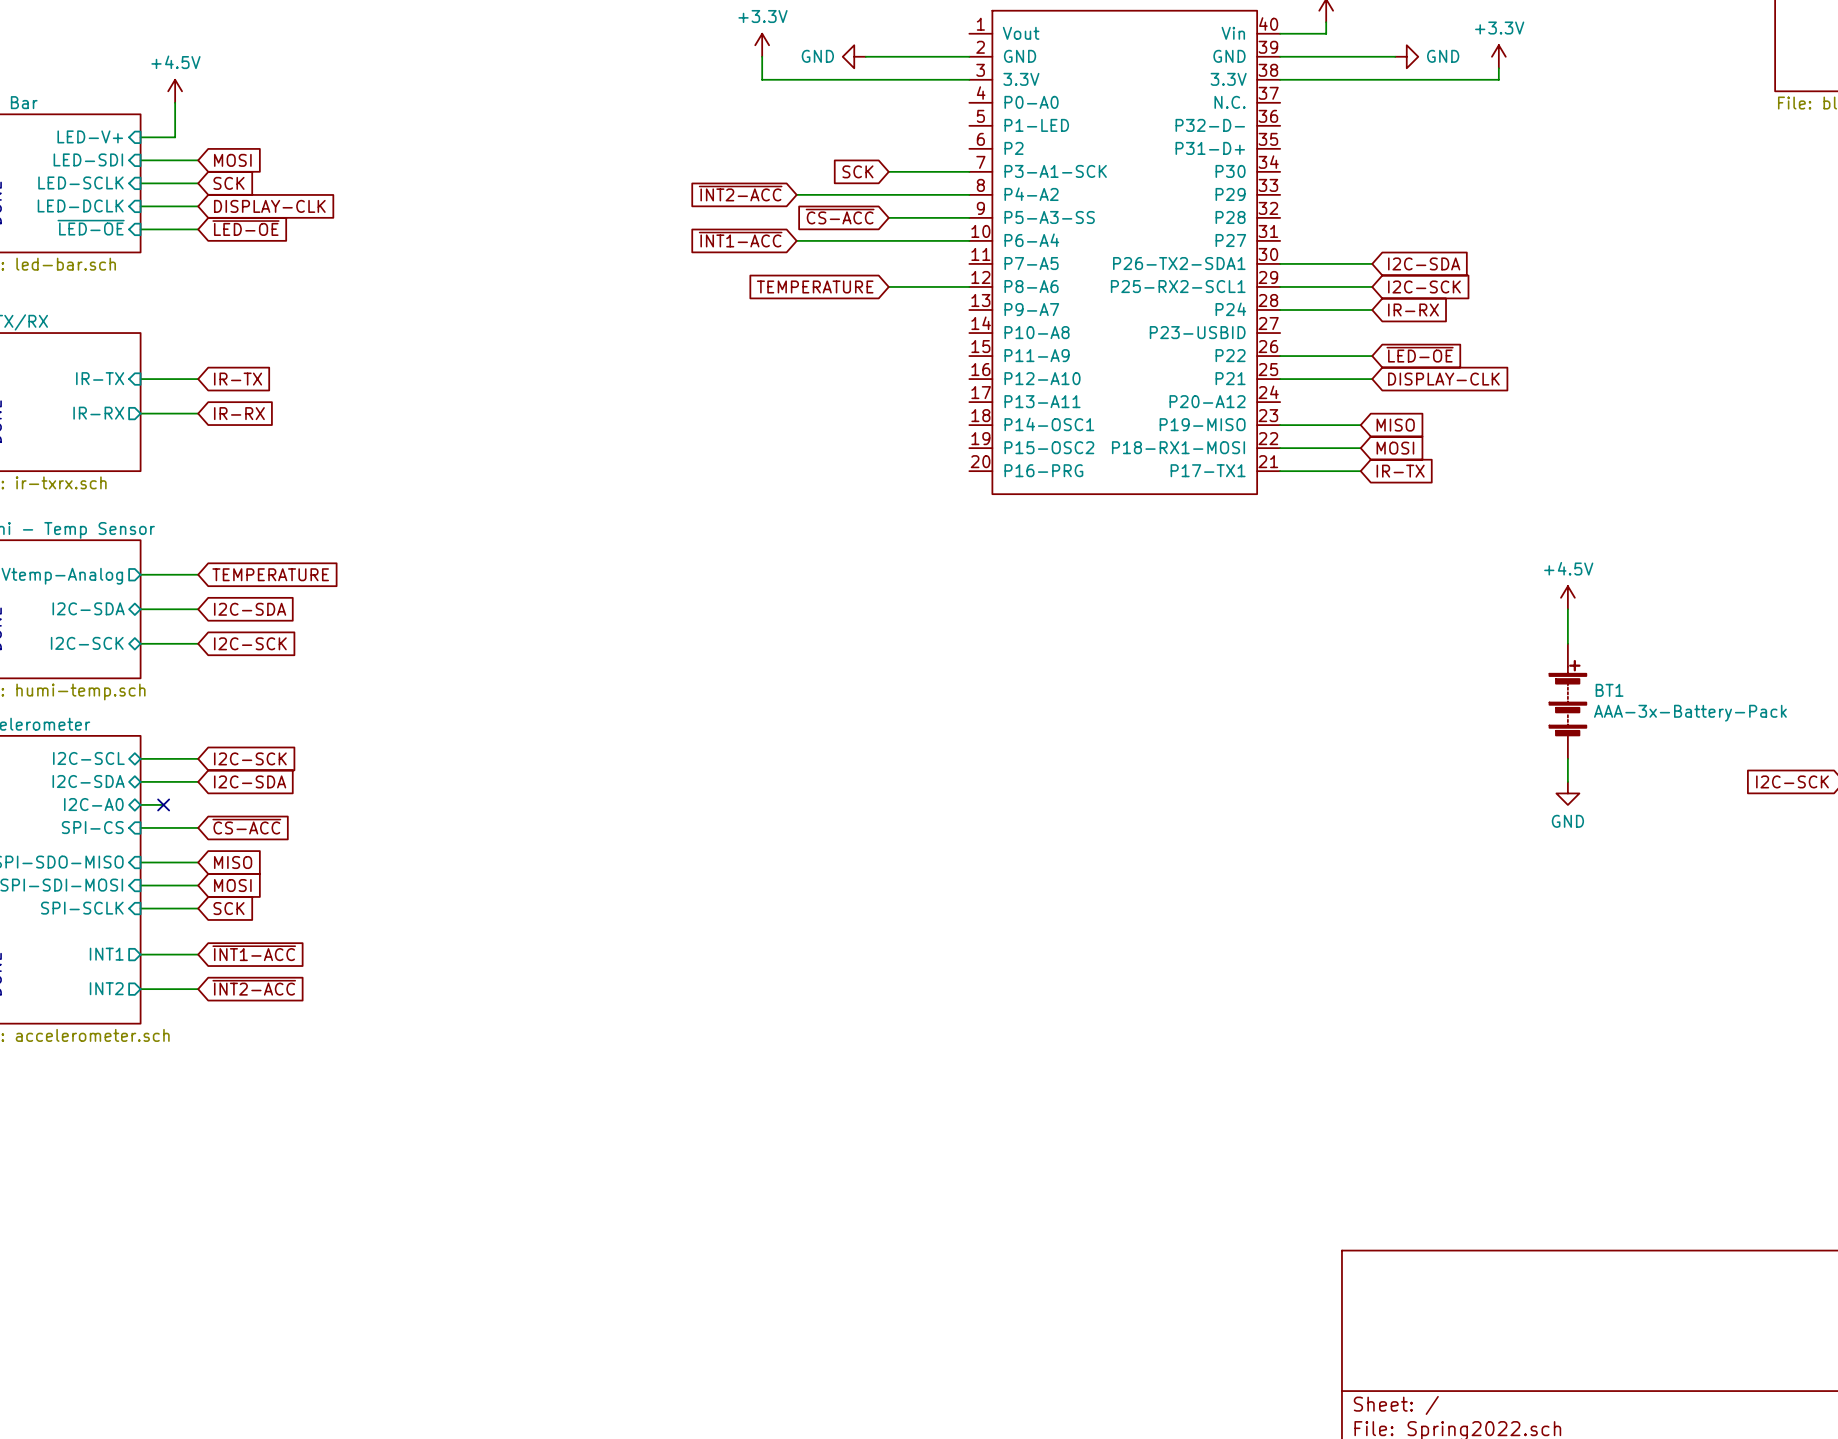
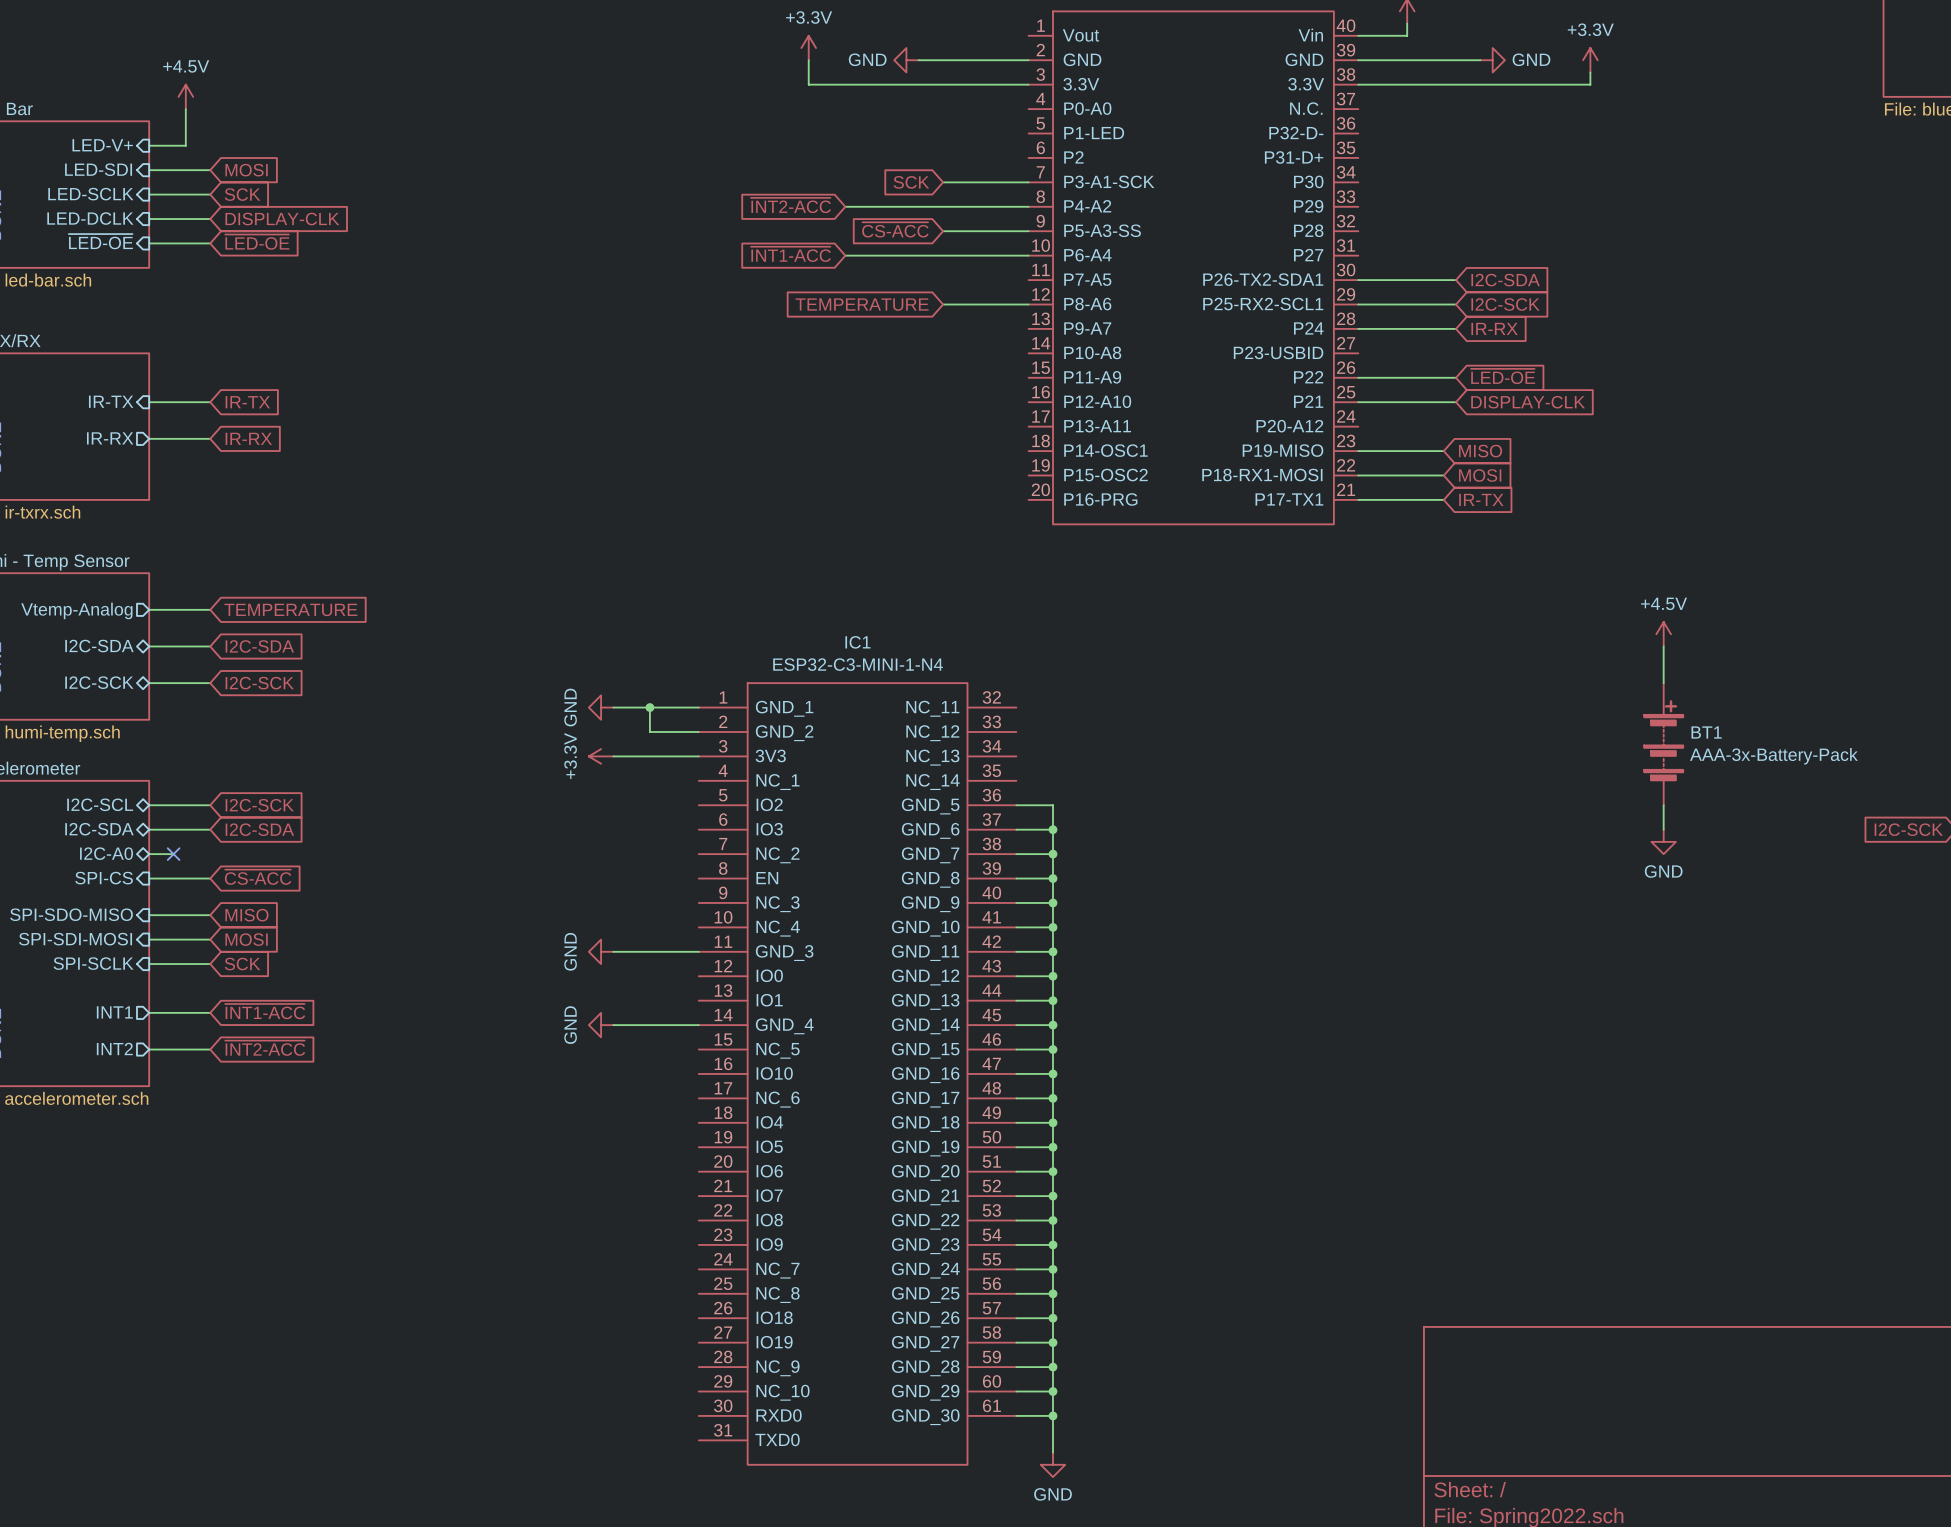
power symbol: none -> GND (601, 707)
wire: none -> (613, 707) (698, 707)
wire: none -> (649, 707) (649, 731) (698, 731)
junction: none -> (649, 707)
power symbol: none -> +3.3V (601, 756)
wire: none -> (613, 756) (698, 756)
wire: none -> (1016, 805) (1052, 805) (1052, 1452)
wire: none -> (1016, 829) (1052, 829)
junction: none -> (1052, 829)
wire: none -> (1016, 854) (1052, 854)
junction: none -> (1052, 854)
wire: none -> (1016, 878) (1052, 878)
junction: none -> (1052, 878)
wire: none -> (1016, 902) (1052, 902)
junction: none -> (1052, 902)
wire: none -> (1016, 927) (1052, 927)
junction: none -> (1052, 927)
power symbol: none -> GND (601, 951)
wire: none -> (613, 951) (698, 951)
wire: none -> (1016, 951) (1052, 951)
junction: none -> (1052, 951)
wire: none -> (1016, 976) (1052, 976)
junction: none -> (1052, 976)
wire: none -> (1016, 1000) (1052, 1000)
junction: none -> (1052, 1000)
power symbol: none -> GND (601, 1025)
wire: none -> (613, 1025) (698, 1025)
wire: none -> (1016, 1025) (1052, 1025)
junction: none -> (1052, 1025)
wire: none -> (1016, 1049) (1052, 1049)
junction: none -> (1052, 1049)
IC1: none -> ESP32-C3-MINI-1-N4 (857, 1073)
wire: none -> (1016, 1073) (1052, 1073)
junction: none -> (1052, 1073)
wire: none -> (1016, 1098) (1052, 1098)
junction: none -> (1052, 1098)
wire: none -> (1016, 1122) (1052, 1122)
junction: none -> (1052, 1122)
wire: none -> (1016, 1147) (1052, 1147)
junction: none -> (1052, 1147)
wire: none -> (1016, 1171) (1052, 1171)
junction: none -> (1052, 1171)
wire: none -> (1016, 1196) (1052, 1196)
junction: none -> (1052, 1196)
wire: none -> (1016, 1220) (1052, 1220)
junction: none -> (1052, 1220)
wire: none -> (1016, 1244) (1052, 1244)
junction: none -> (1052, 1244)
wire: none -> (1016, 1269) (1052, 1269)
junction: none -> (1052, 1269)
wire: none -> (1016, 1293) (1052, 1293)
junction: none -> (1052, 1293)
wire: none -> (1016, 1318) (1052, 1318)
junction: none -> (1052, 1318)
wire: none -> (1016, 1342) (1052, 1342)
junction: none -> (1052, 1342)
wire: none -> (1016, 1367) (1052, 1367)
junction: none -> (1052, 1367)
wire: none -> (1016, 1391) (1052, 1391)
junction: none -> (1052, 1391)
wire: none -> (1016, 1415) (1052, 1415)
junction: none -> (1052, 1415)
power symbol: none -> GND (1052, 1464)

